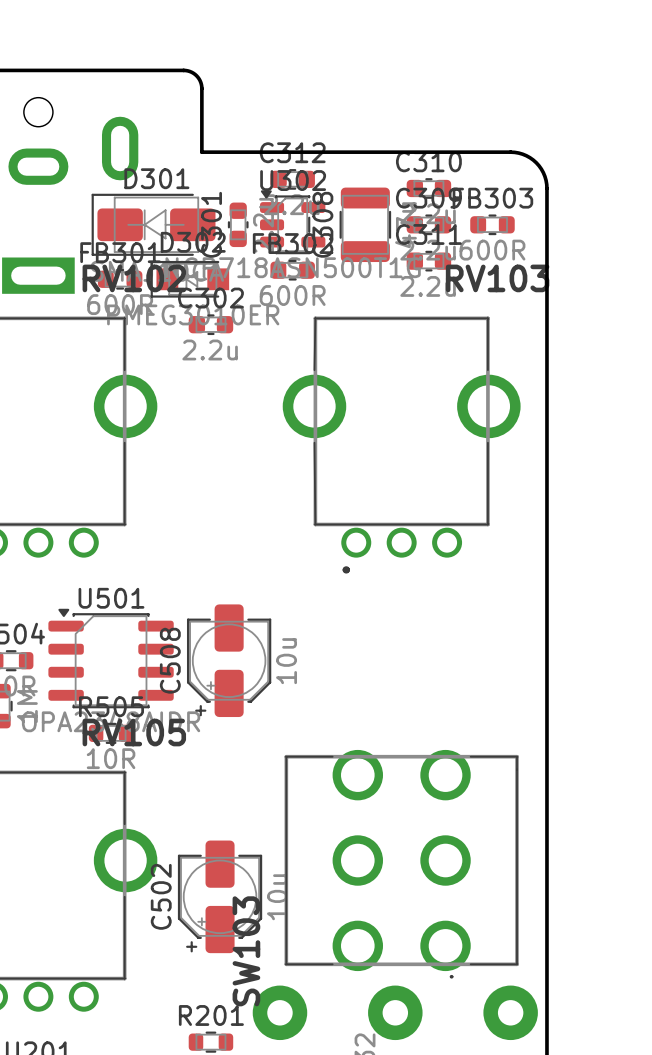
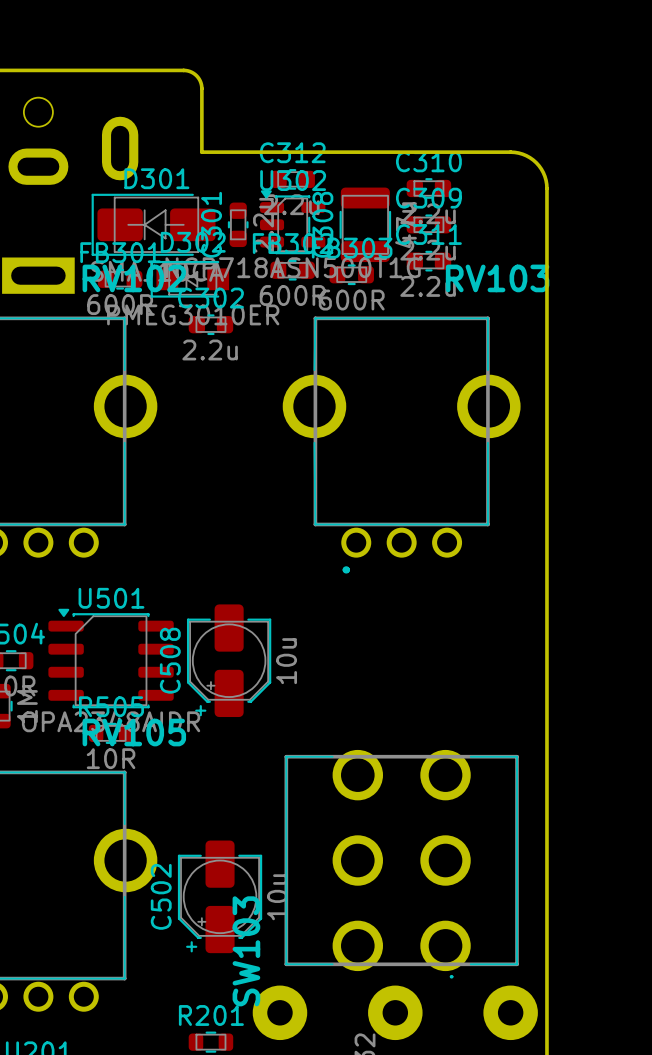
FB303 position: (492, 224) -> (351, 274)

